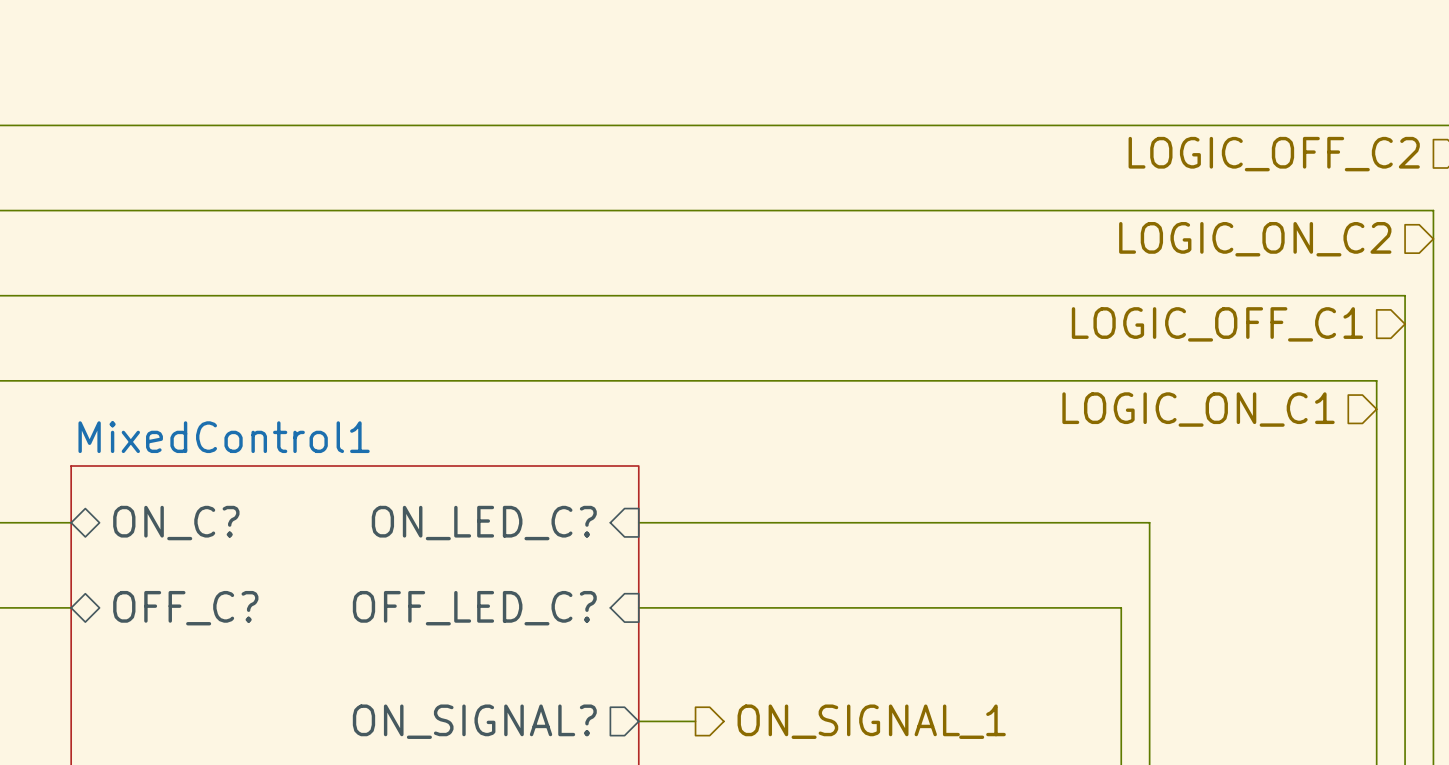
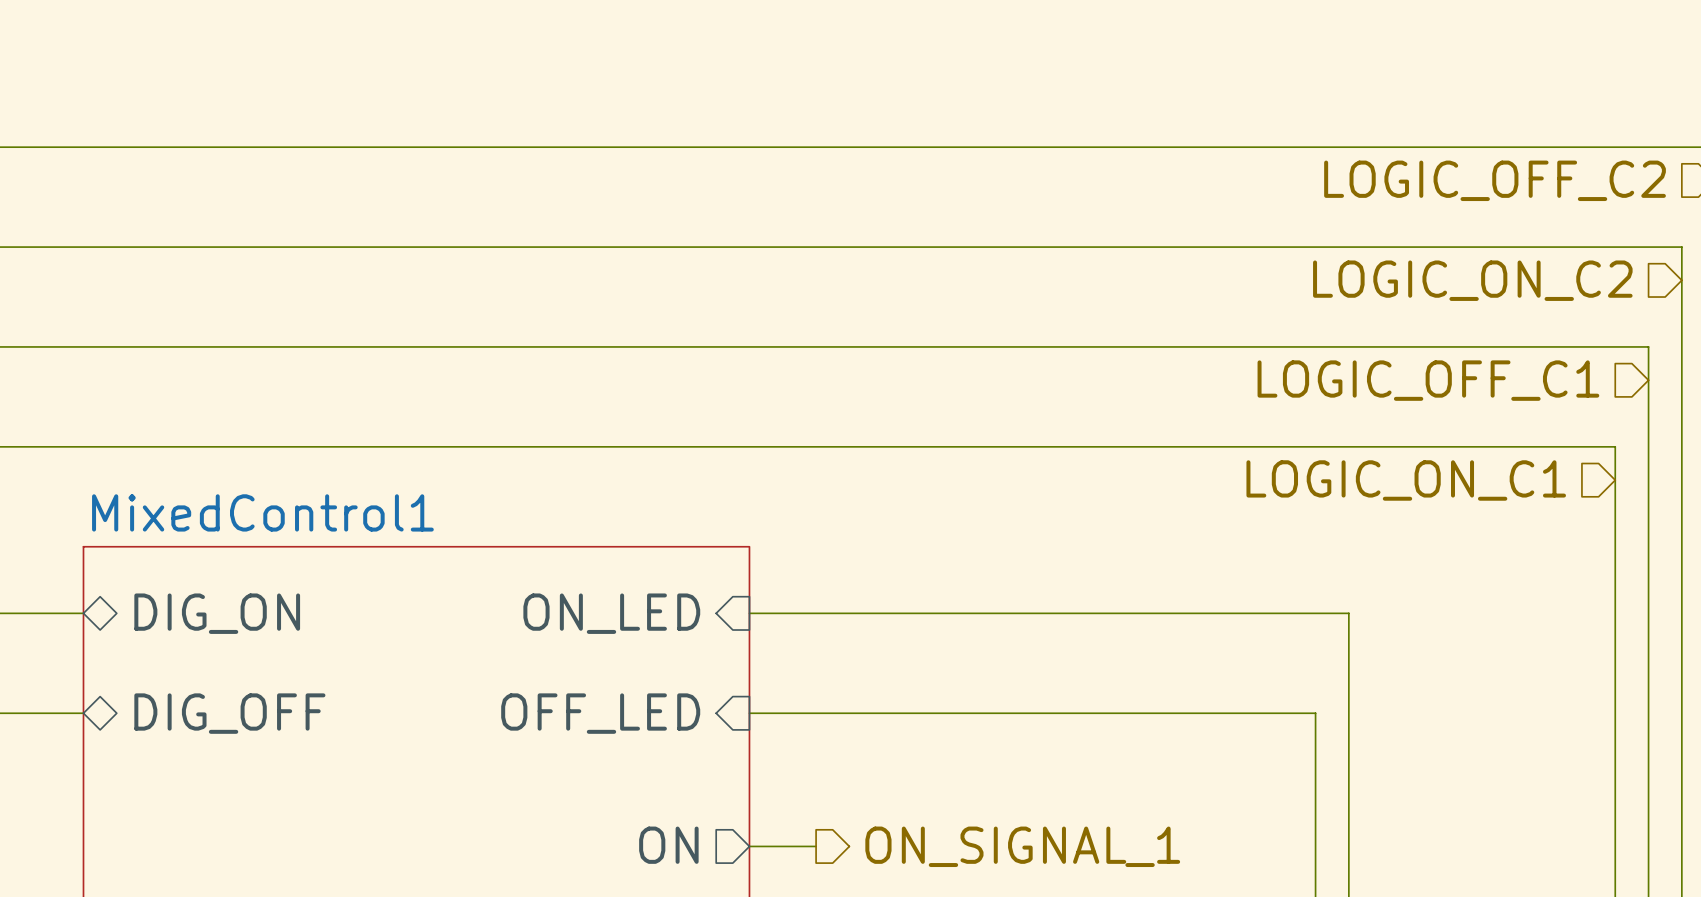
sheet pin: ON_C? (176, 523) -> DIG_ON (217, 613)
sheet pin: ON_LED_C? (484, 523) -> ON_LED (611, 613)
sheet pin: OFF_C? (185, 608) -> DIG_OFF (229, 713)
sheet pin: OFF_LED_C? (474, 608) -> OFF_LED (600, 713)
sheet pin: ON_SIGNAL? (474, 721) -> ON (668, 845)

